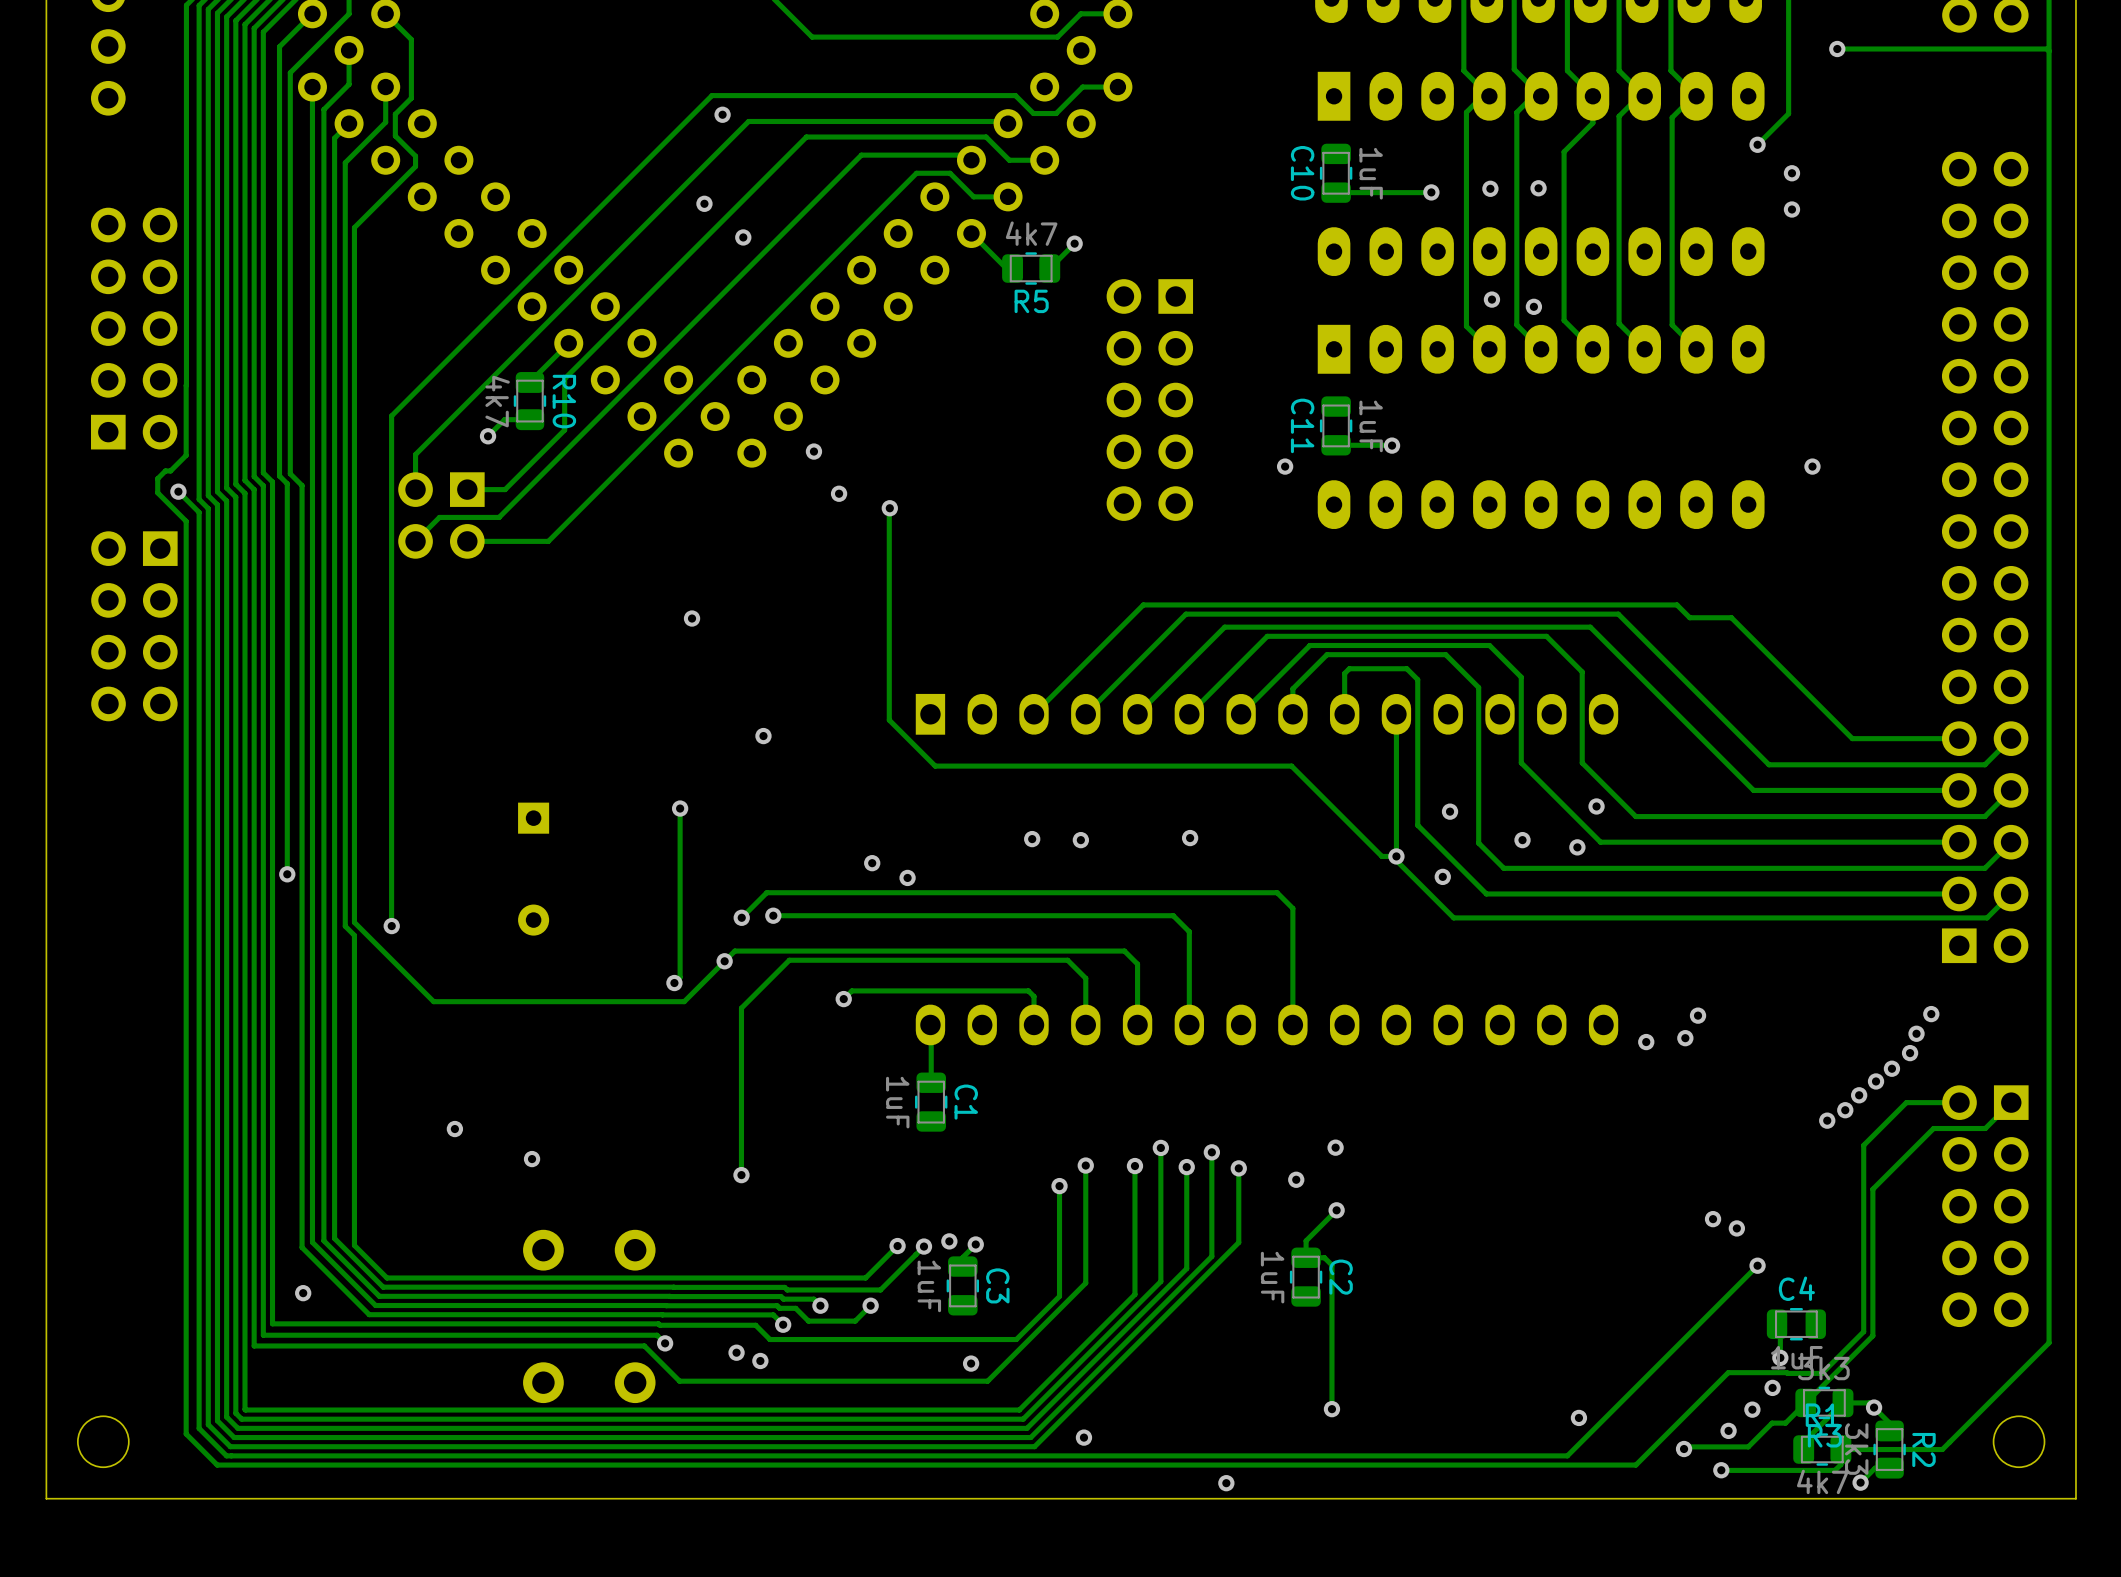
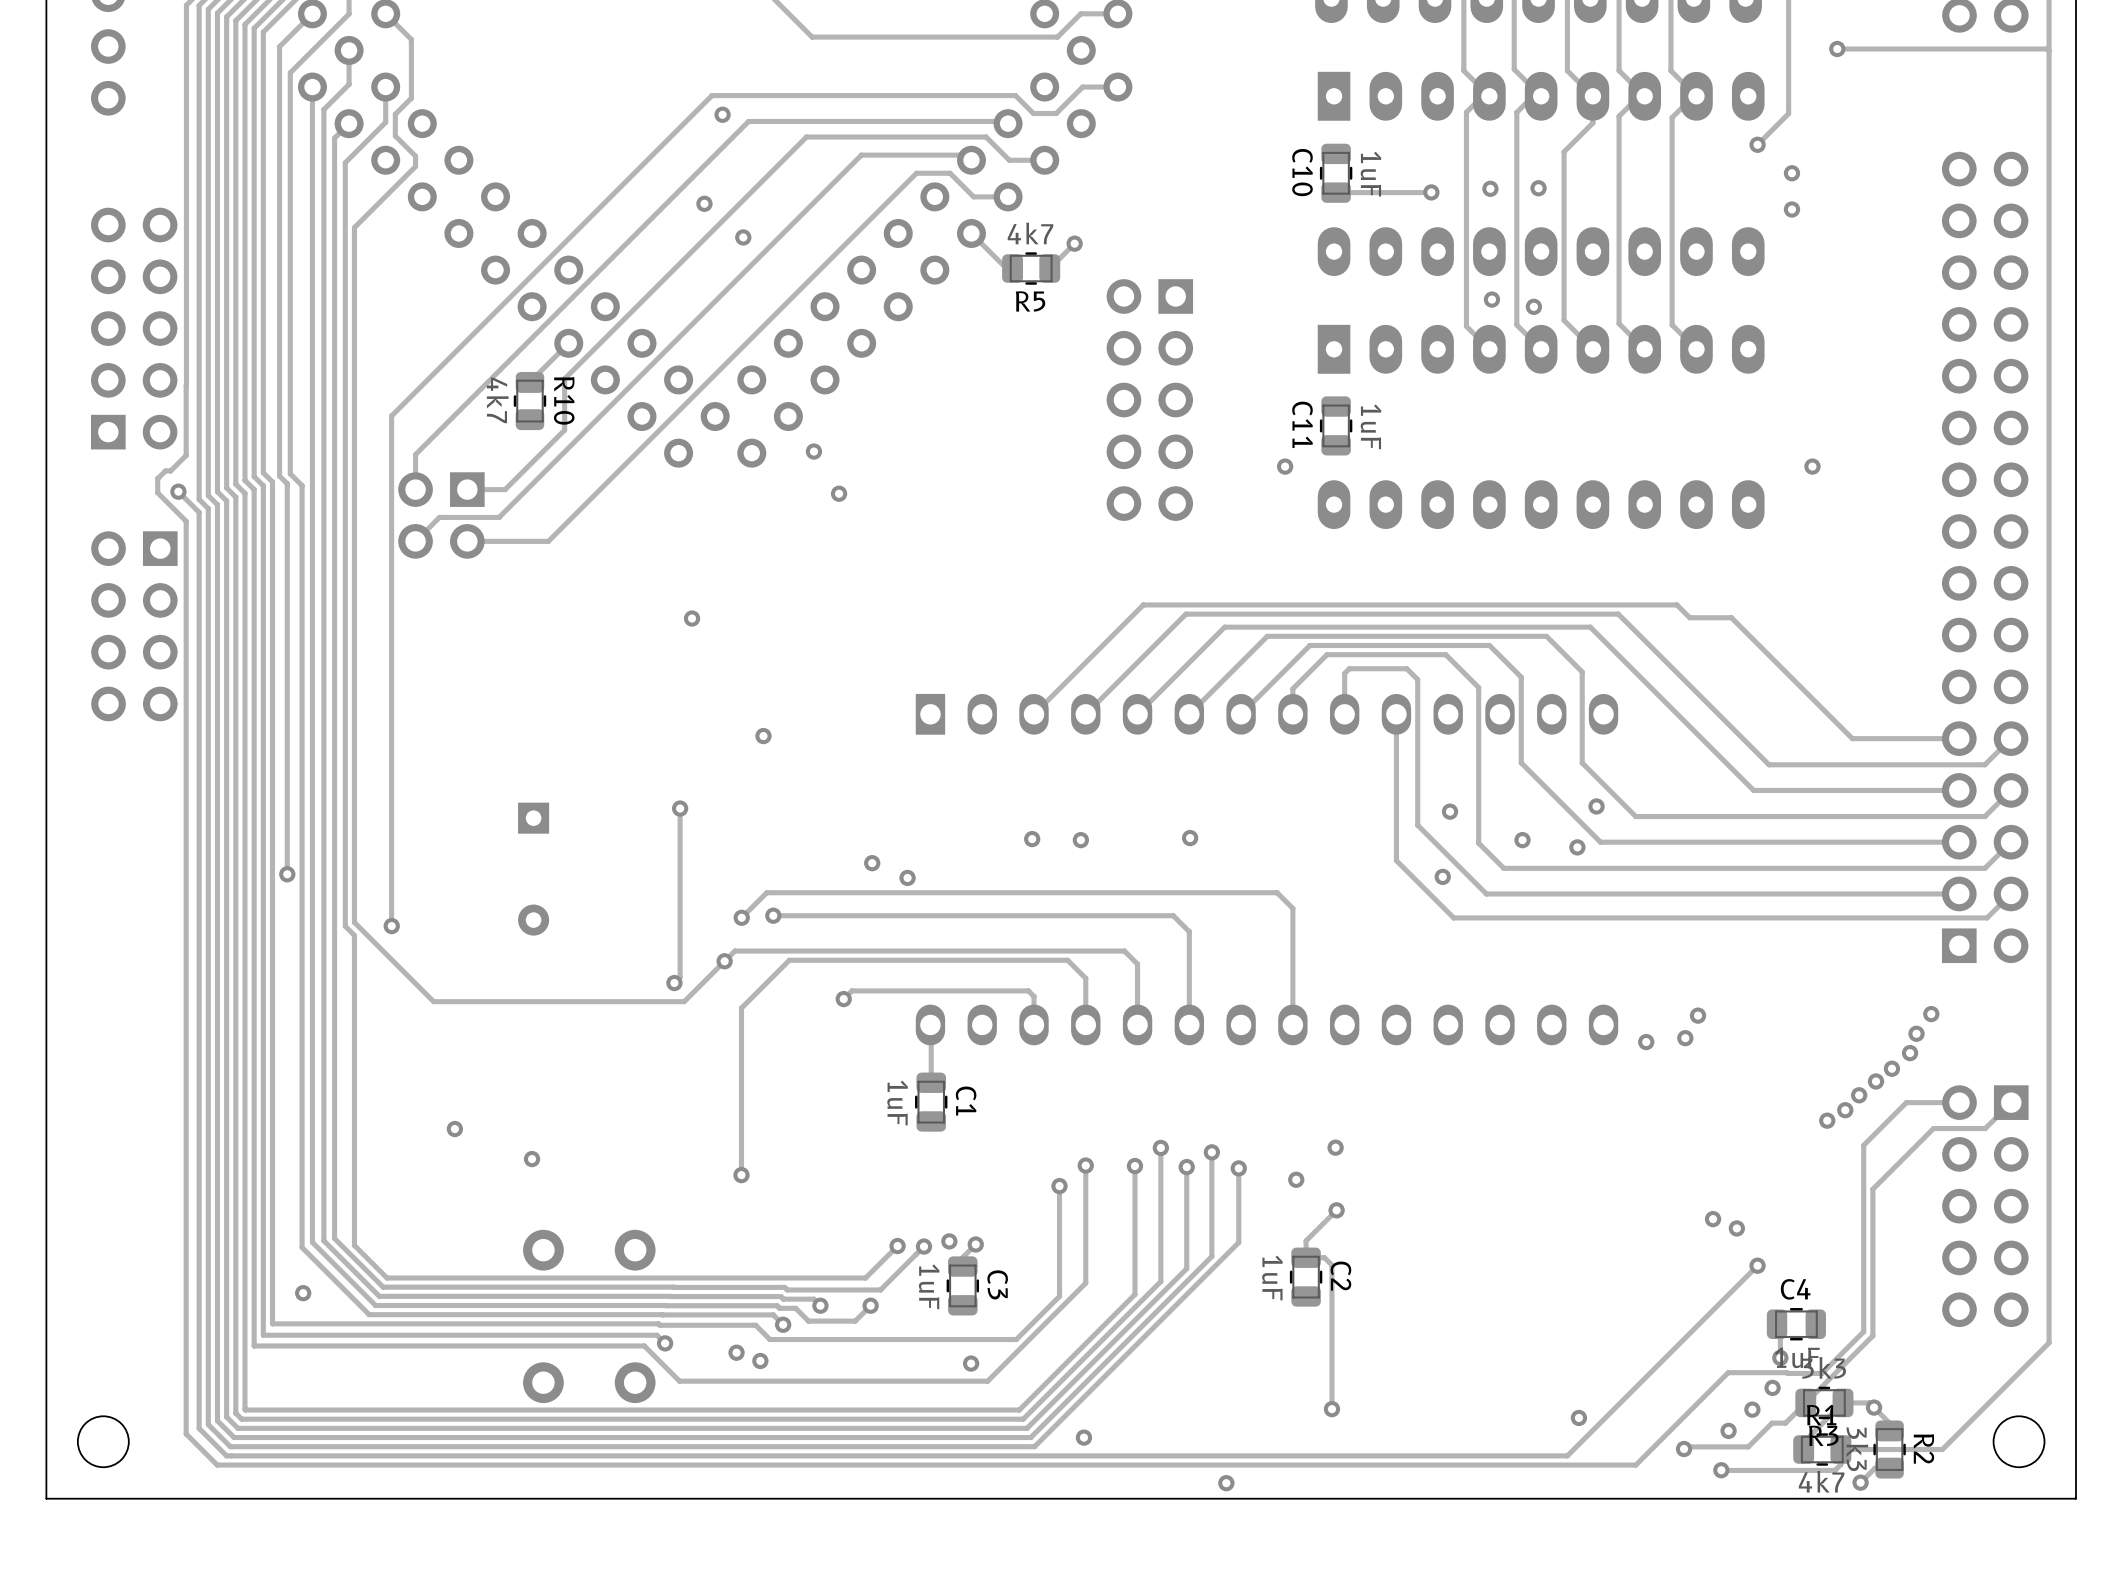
track: (529, 419) (504, 419) (488, 436) -> none
via: (488, 436) -> none
track: (1336, 445) (1392, 445) -> none
via: (1392, 445) -> none
track: (889, 508) (889, 720) (935, 766) (1291, 766) (1381, 856) (1396, 856) -> none
via: (889, 508) -> none
via: (1396, 856) -> none

